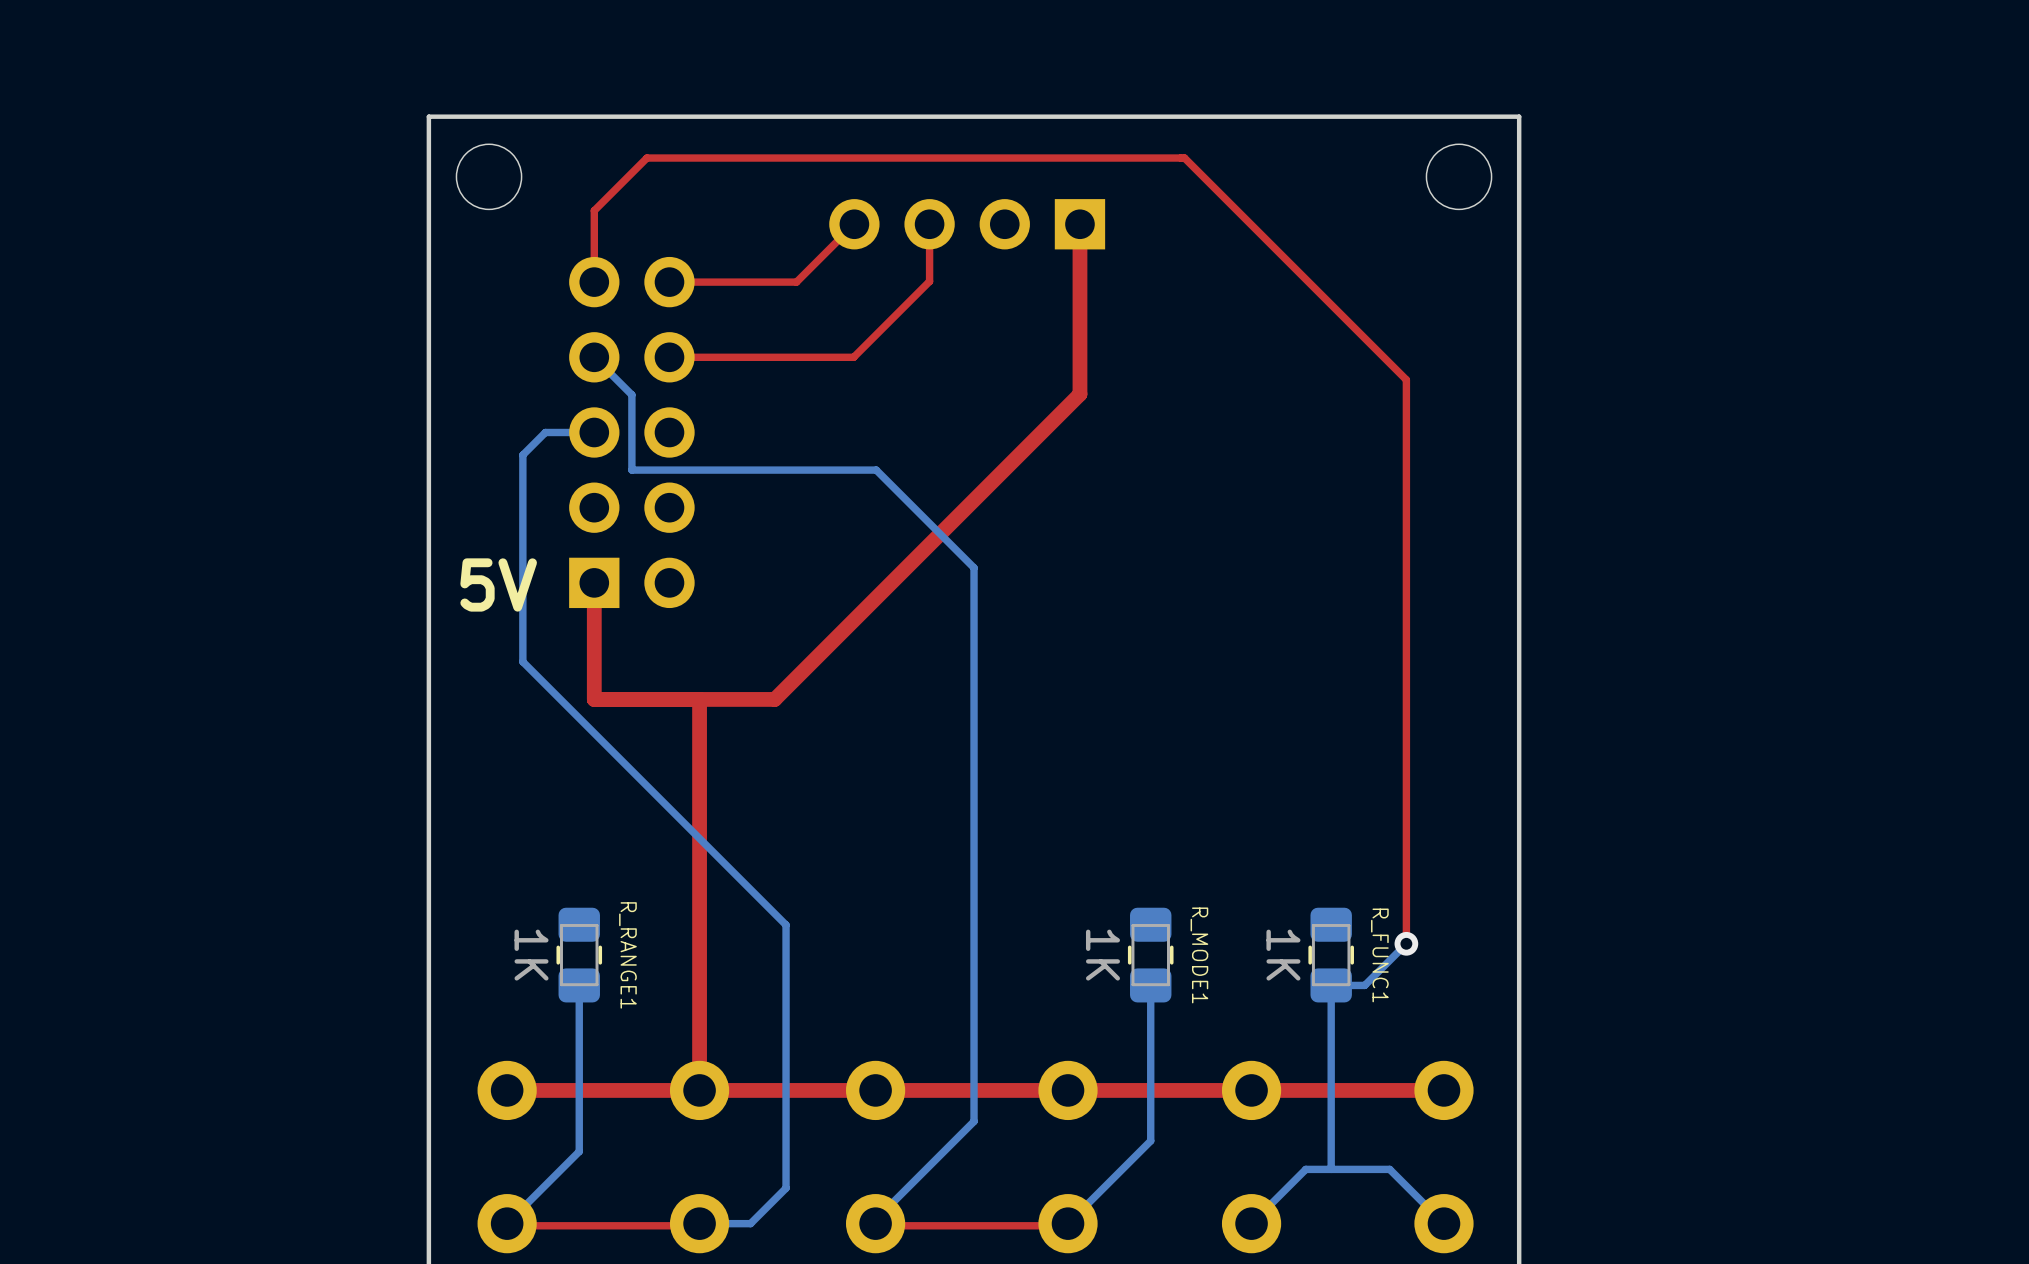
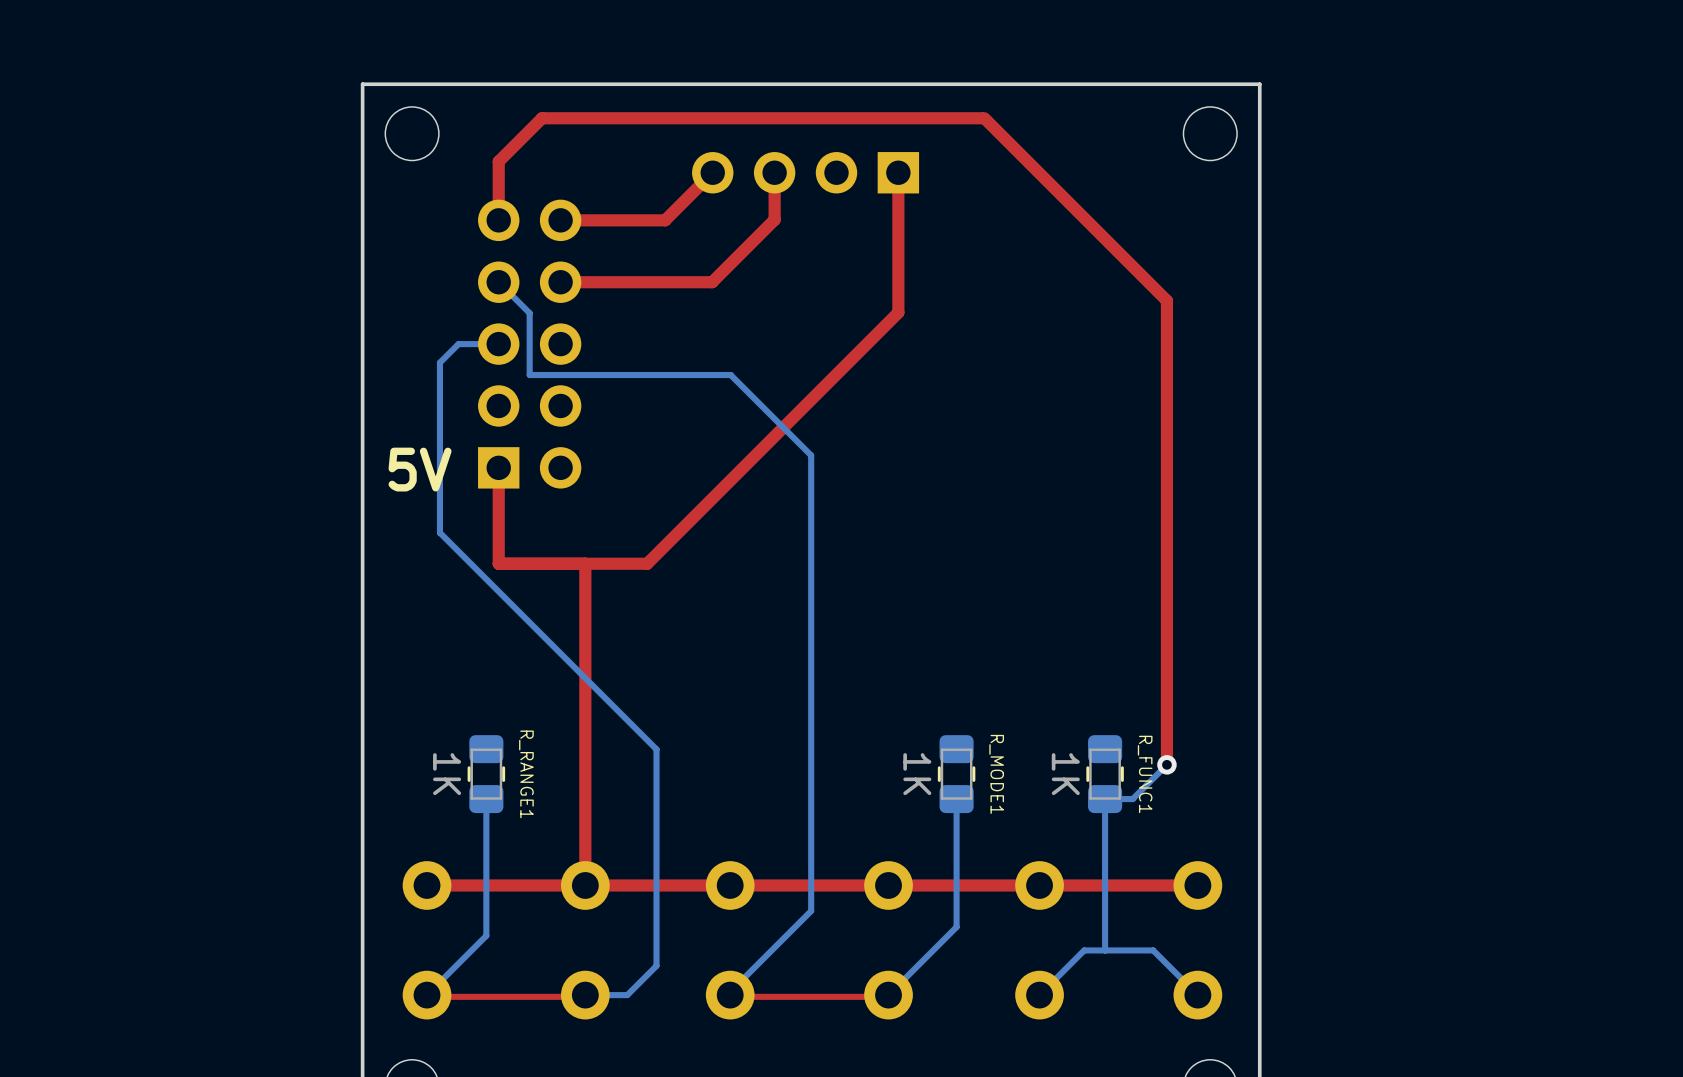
top track width: thin (1180, 158) (646, 158) (594, 210) (594, 282) -> thick (981, 118) (542, 118) (498, 161) (498, 220)
top track width: thin (1184, 158) (1406, 379) (1406, 943) -> thick (984, 118) (1166, 300) (1166, 764)
top track width: thin (854, 224) (796, 282) (669, 282) -> thick (712, 172) (665, 220) (560, 220)
top track width: thin (929, 224) (929, 281) (853, 357) (669, 357) -> thick (774, 172) (774, 219) (712, 282) (560, 282)

